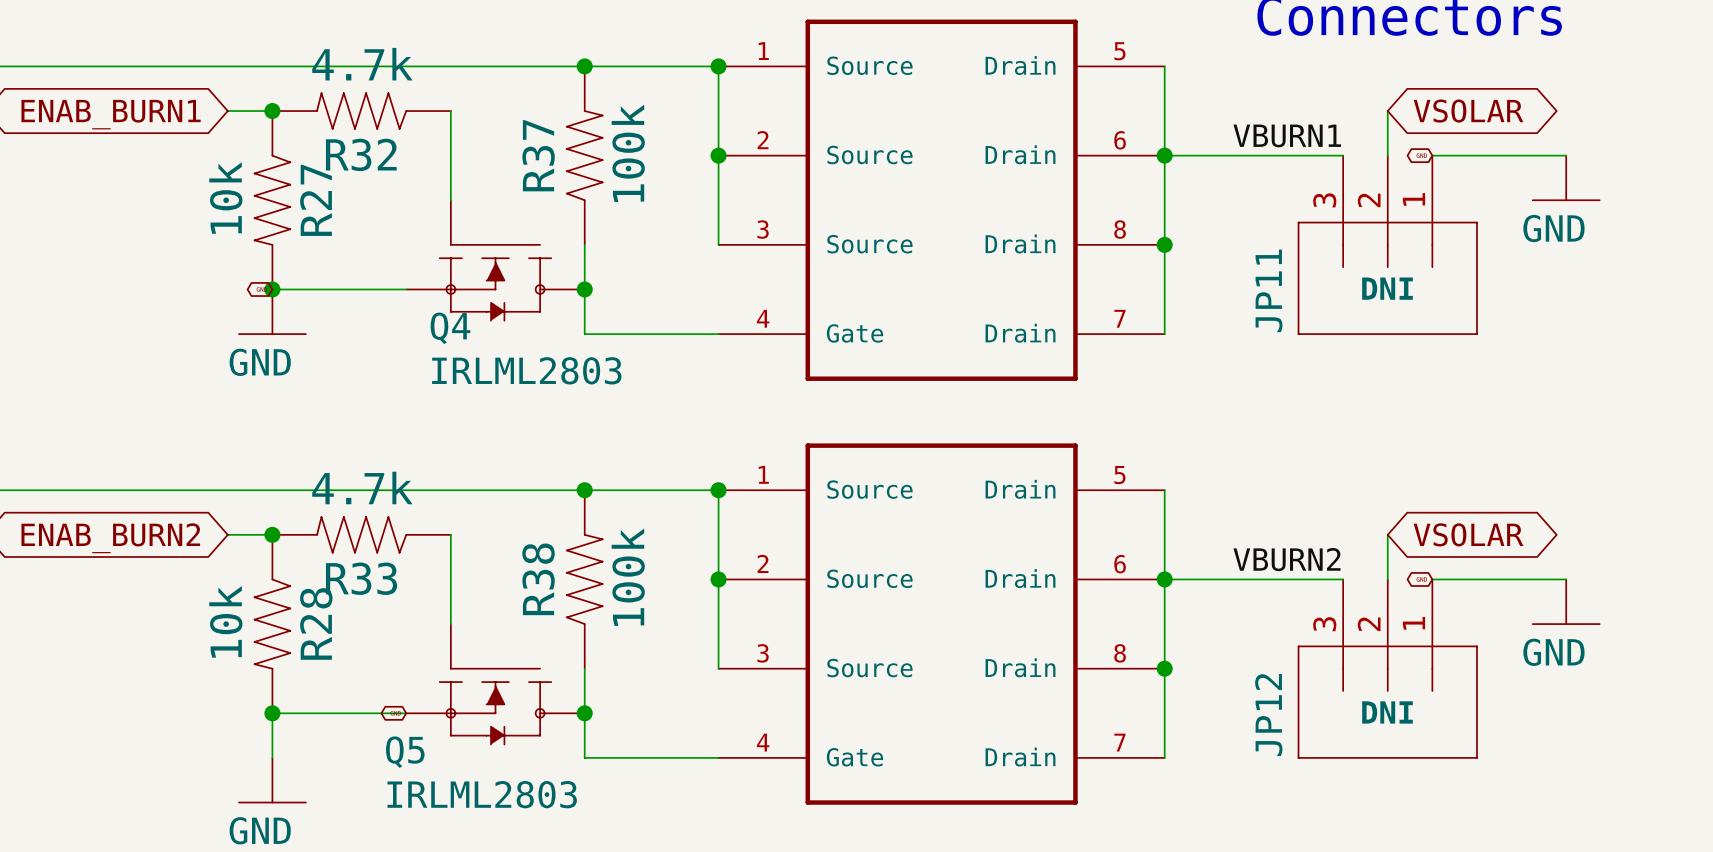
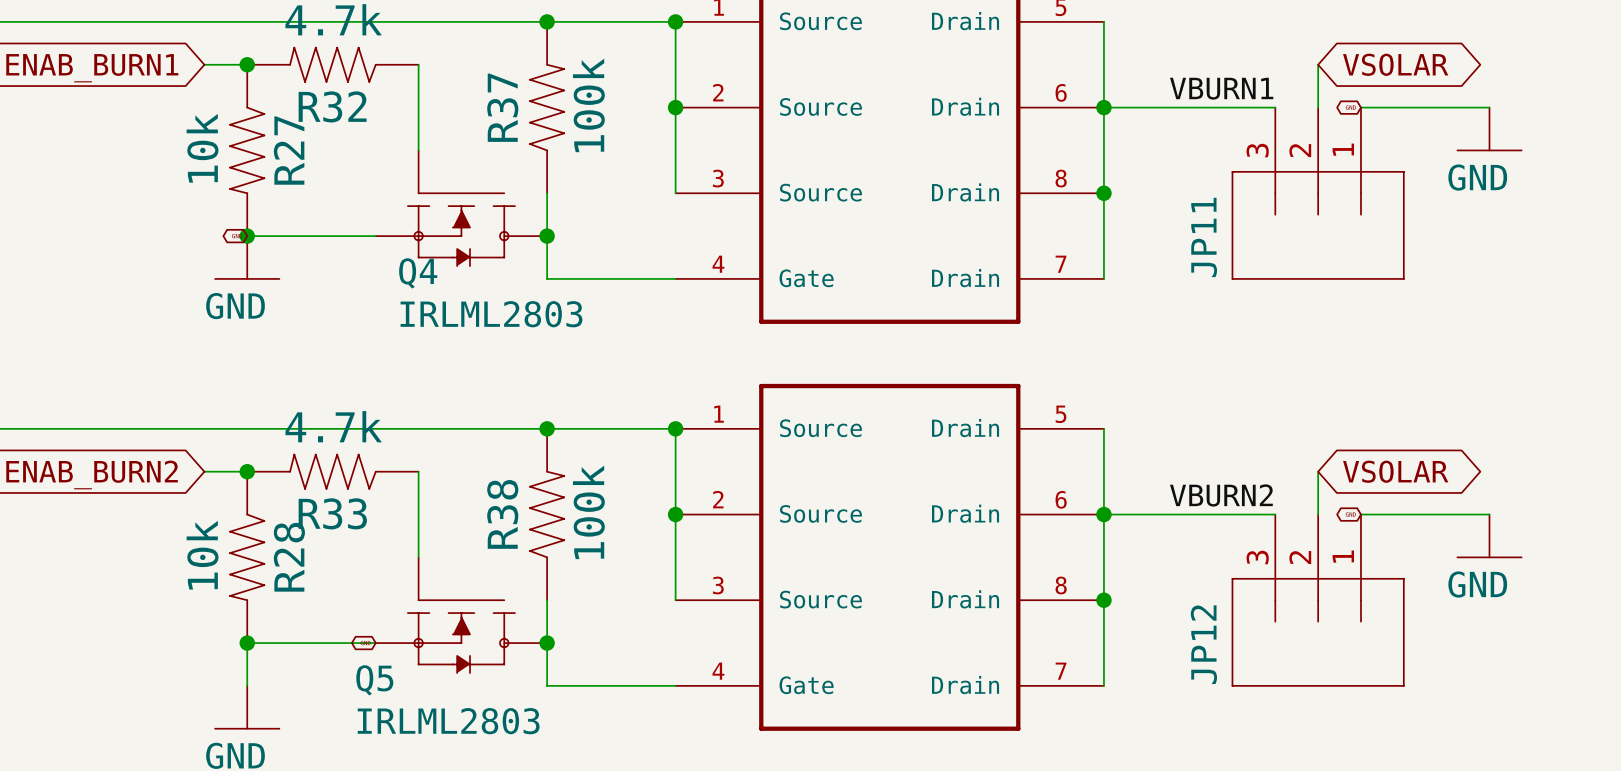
JP11 text: DNI (1387, 288) -> none
JP12 text: DNI (1387, 712) -> none

